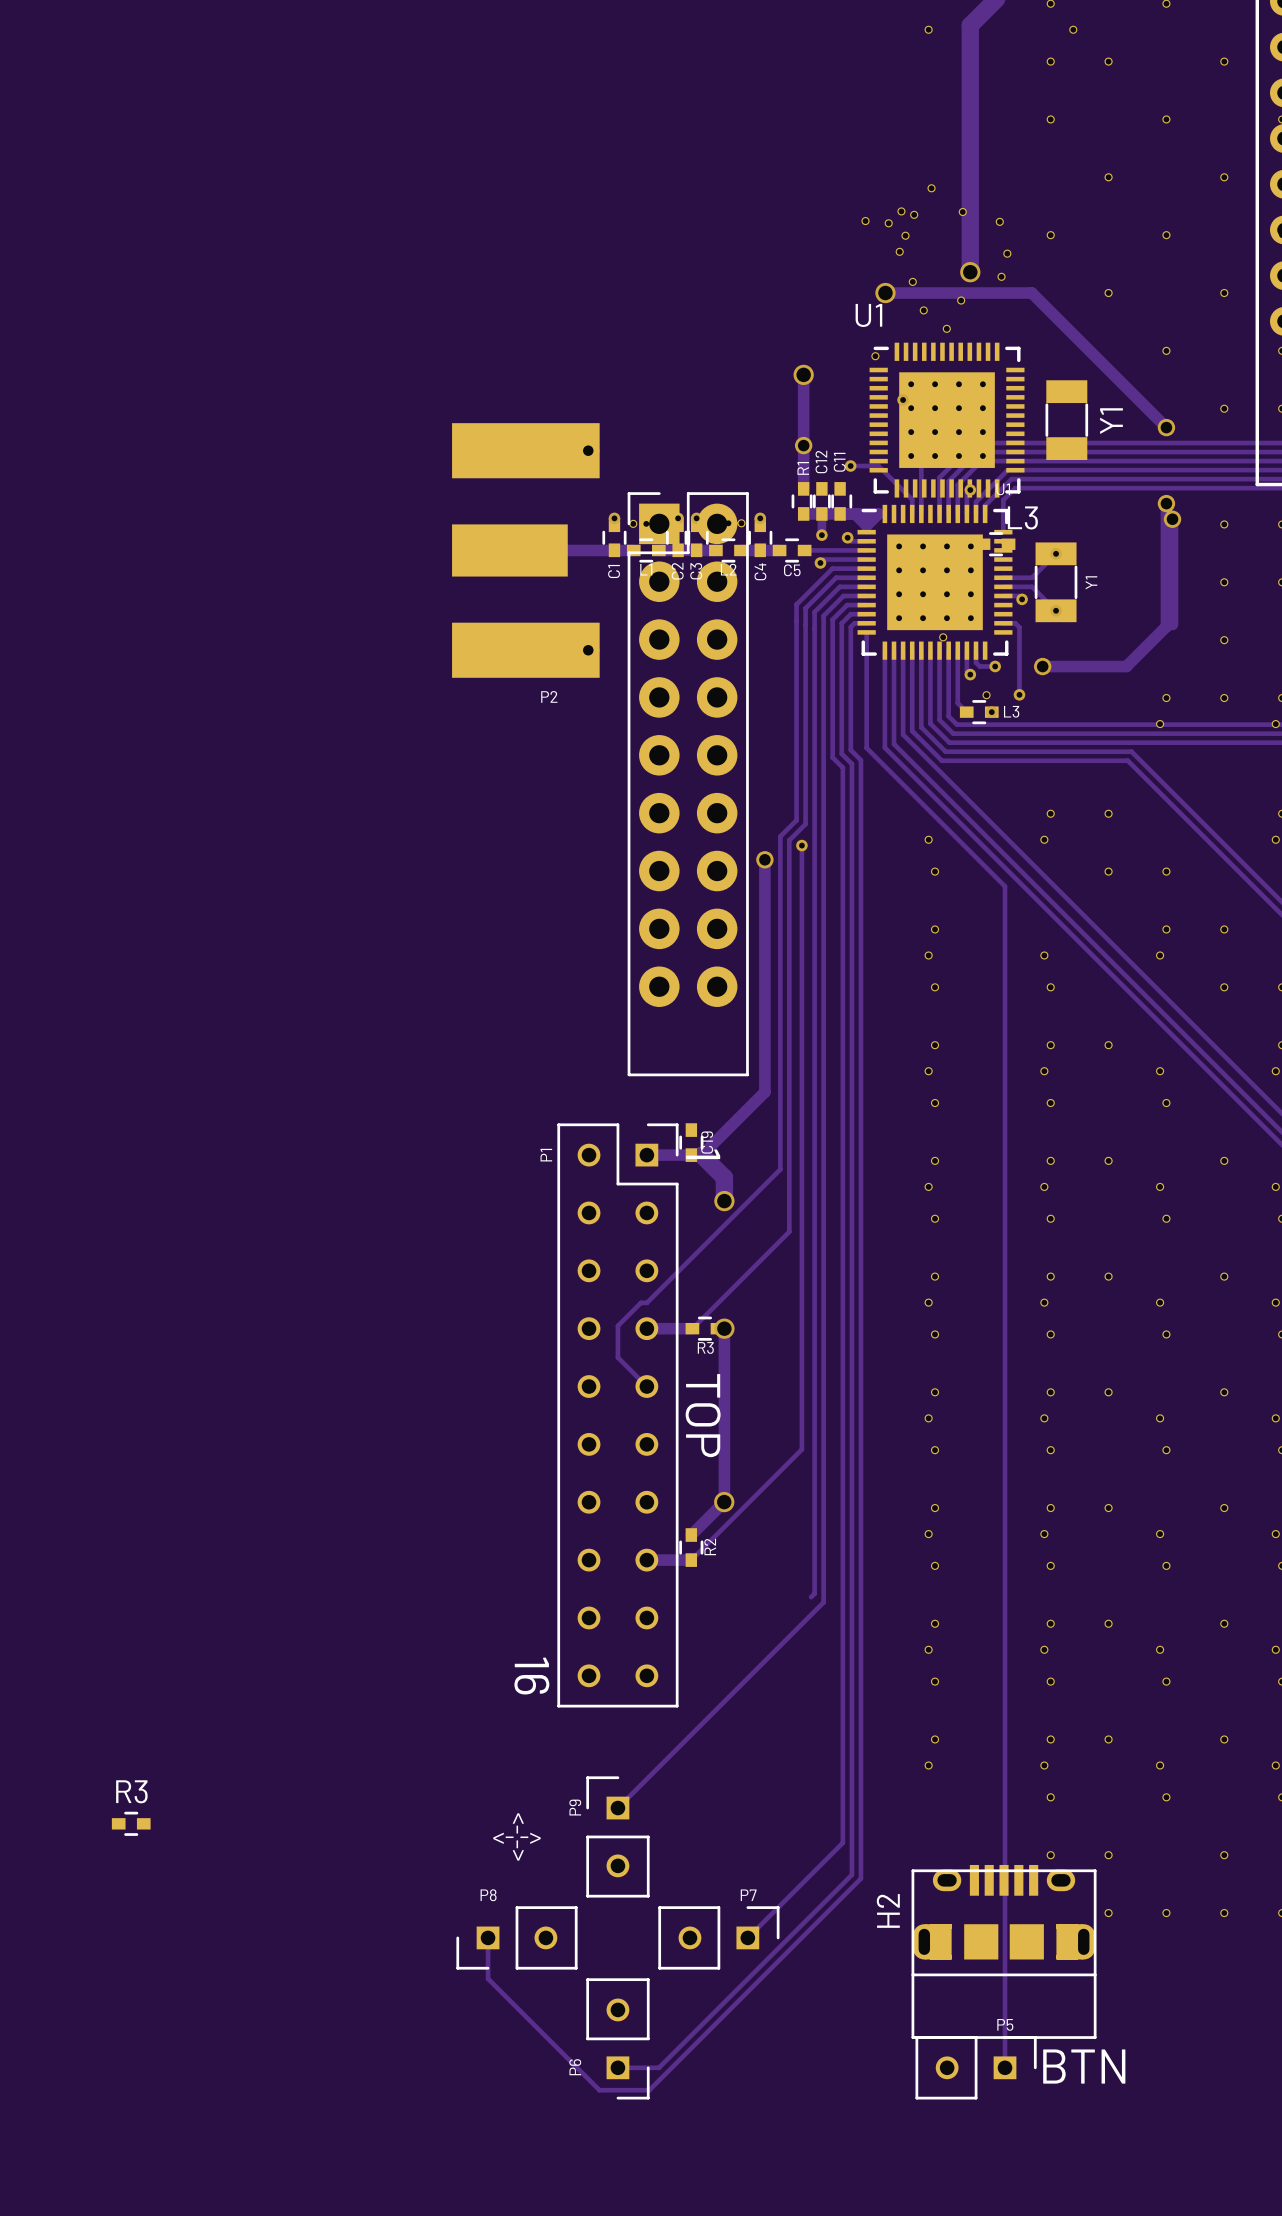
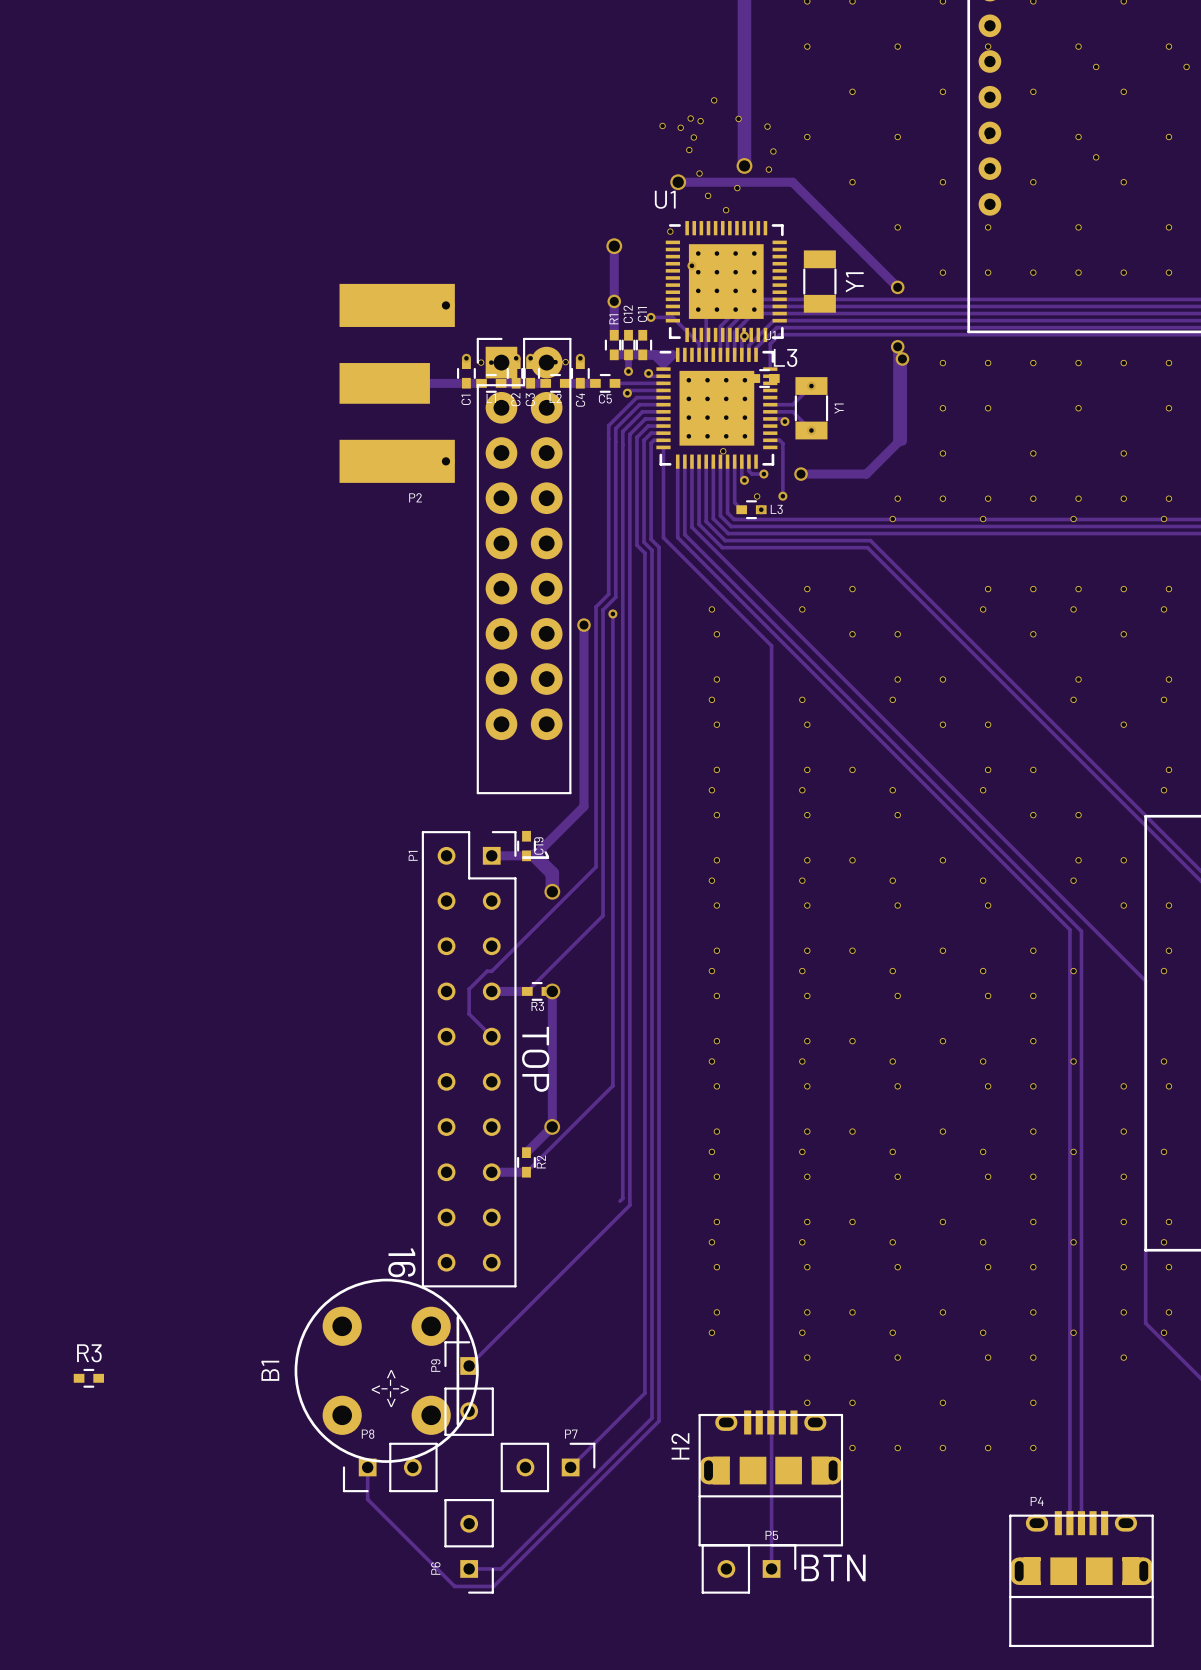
B1: none -> (386, 1370)

